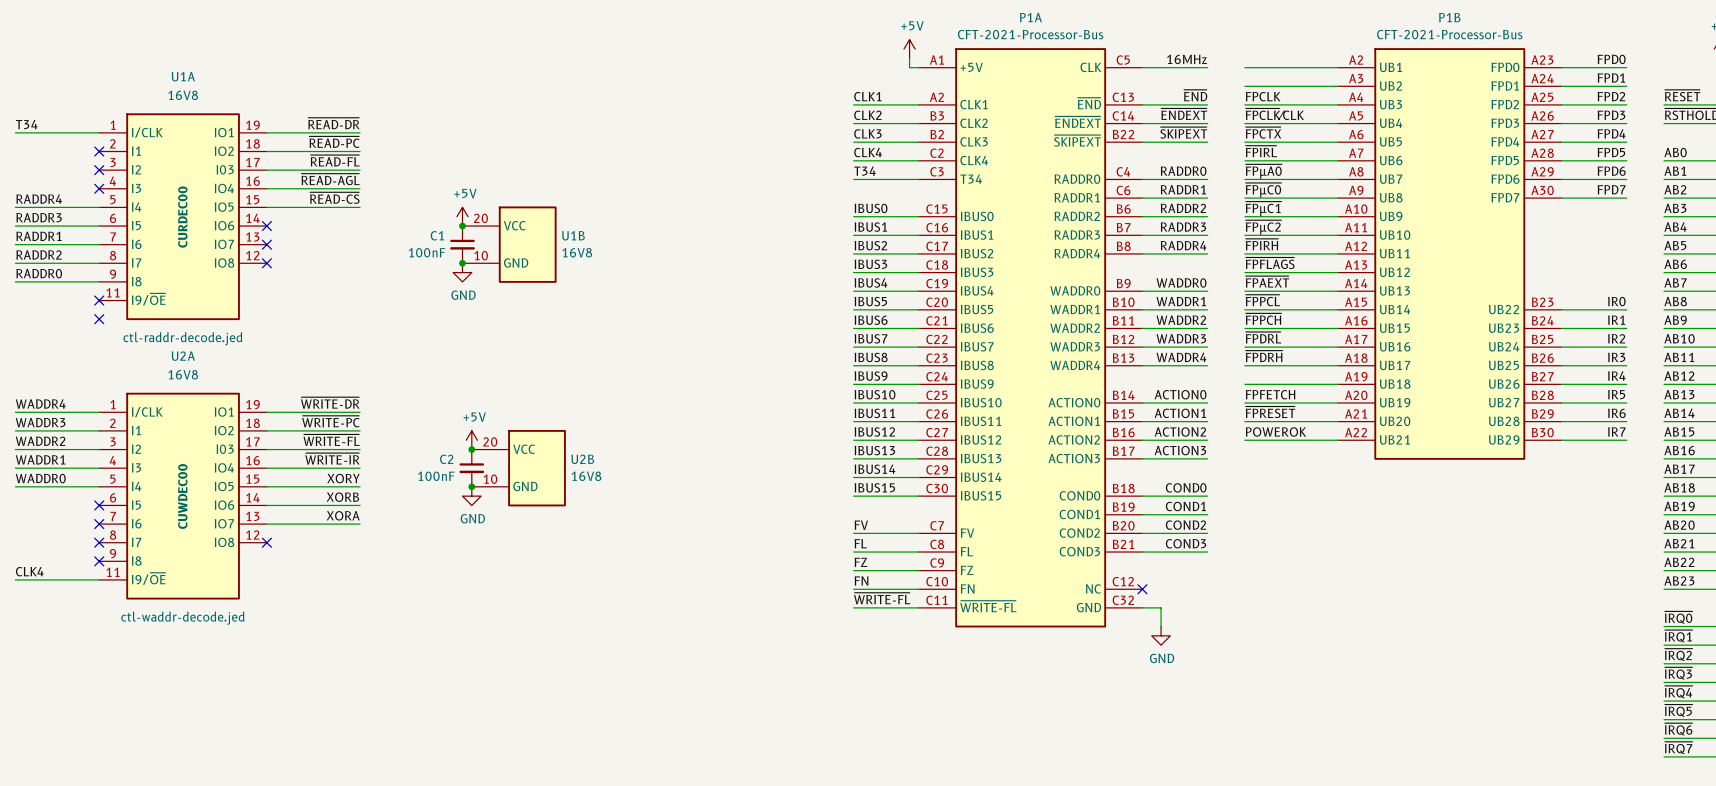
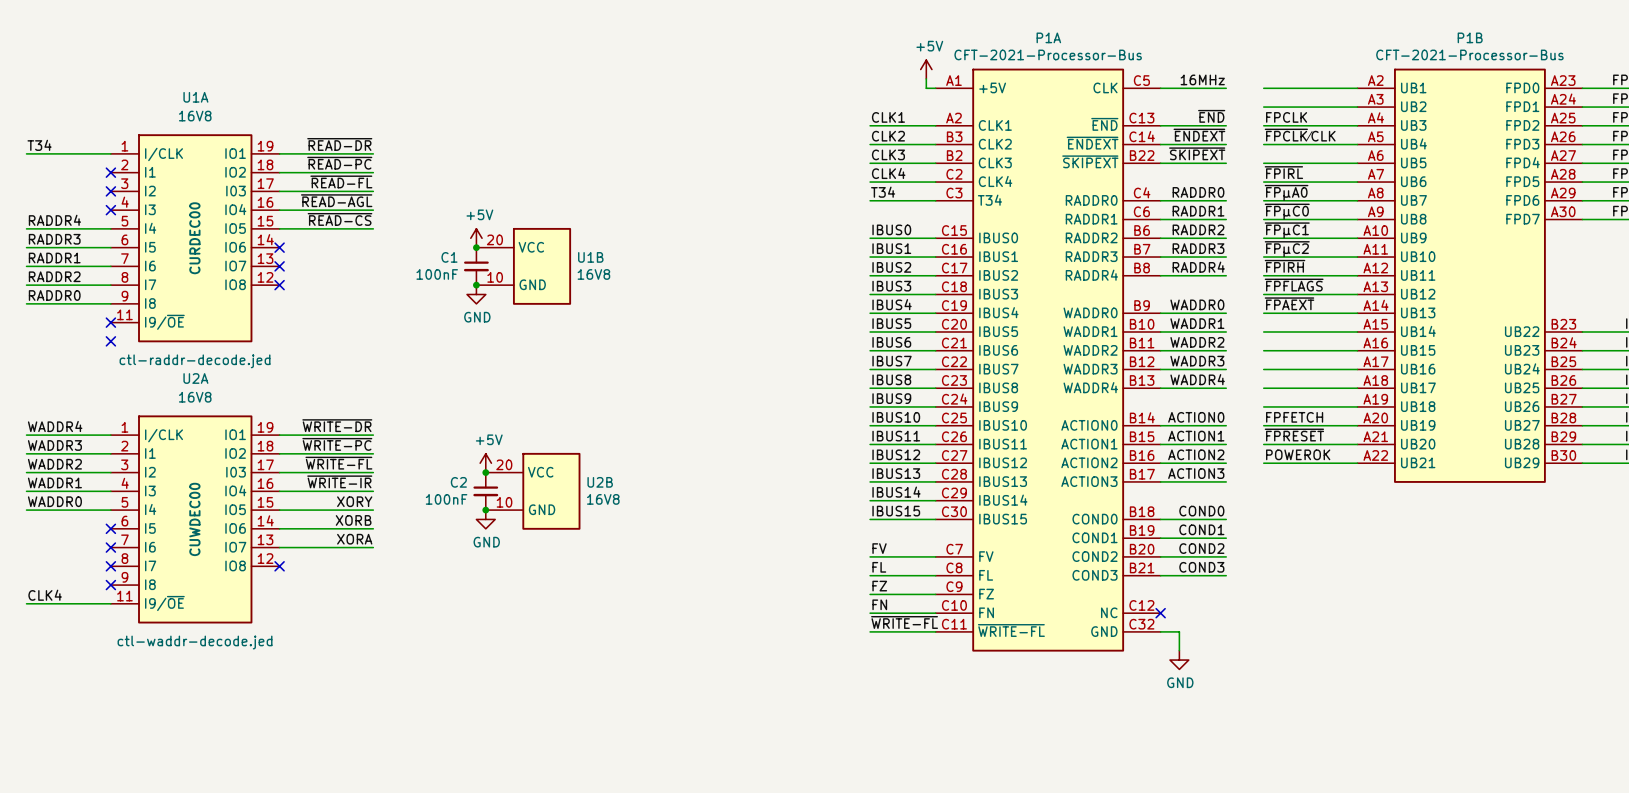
label: ~{FPCTX} (1263, 132) -> none
label: ~{FPPCL} (1262, 300) -> none
label: ~{FPPCH} (1263, 319) -> none
label: ~{FPDRL} (1263, 337) -> none
label: ~{FPDRH} (1264, 356) -> none

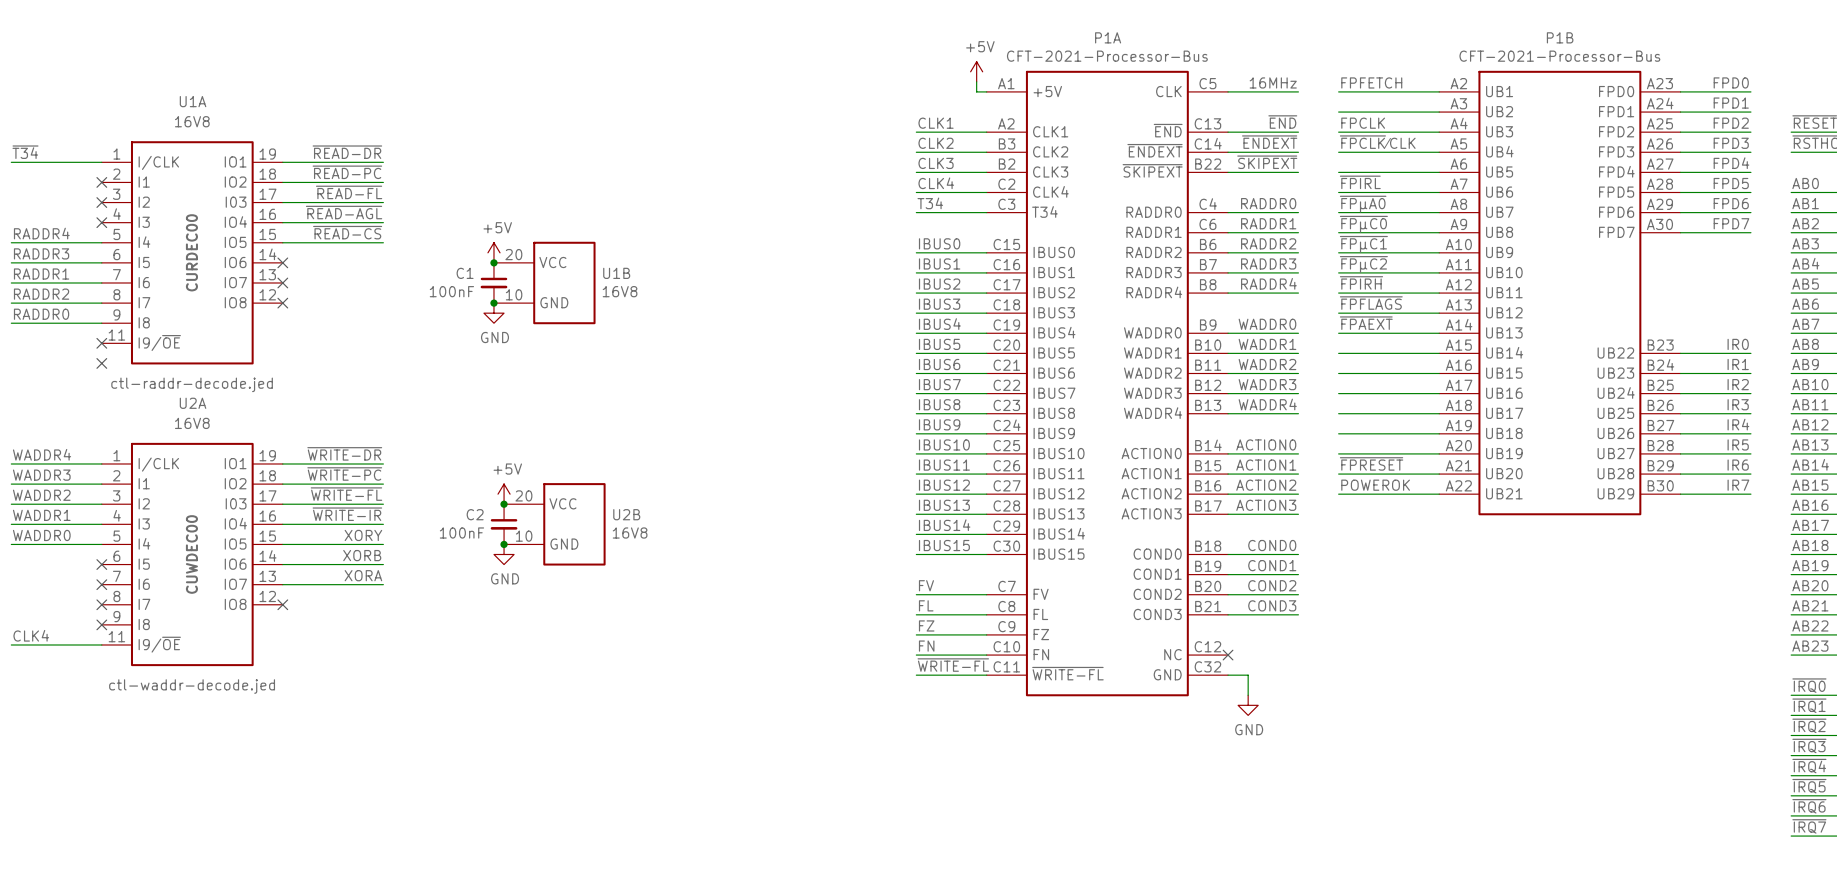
label: none -> FPFETCH (1371, 82)
label: T34 (39, 145) -> ~{T34} (25, 152)
label: FPFETCH (1294, 417) -> none

